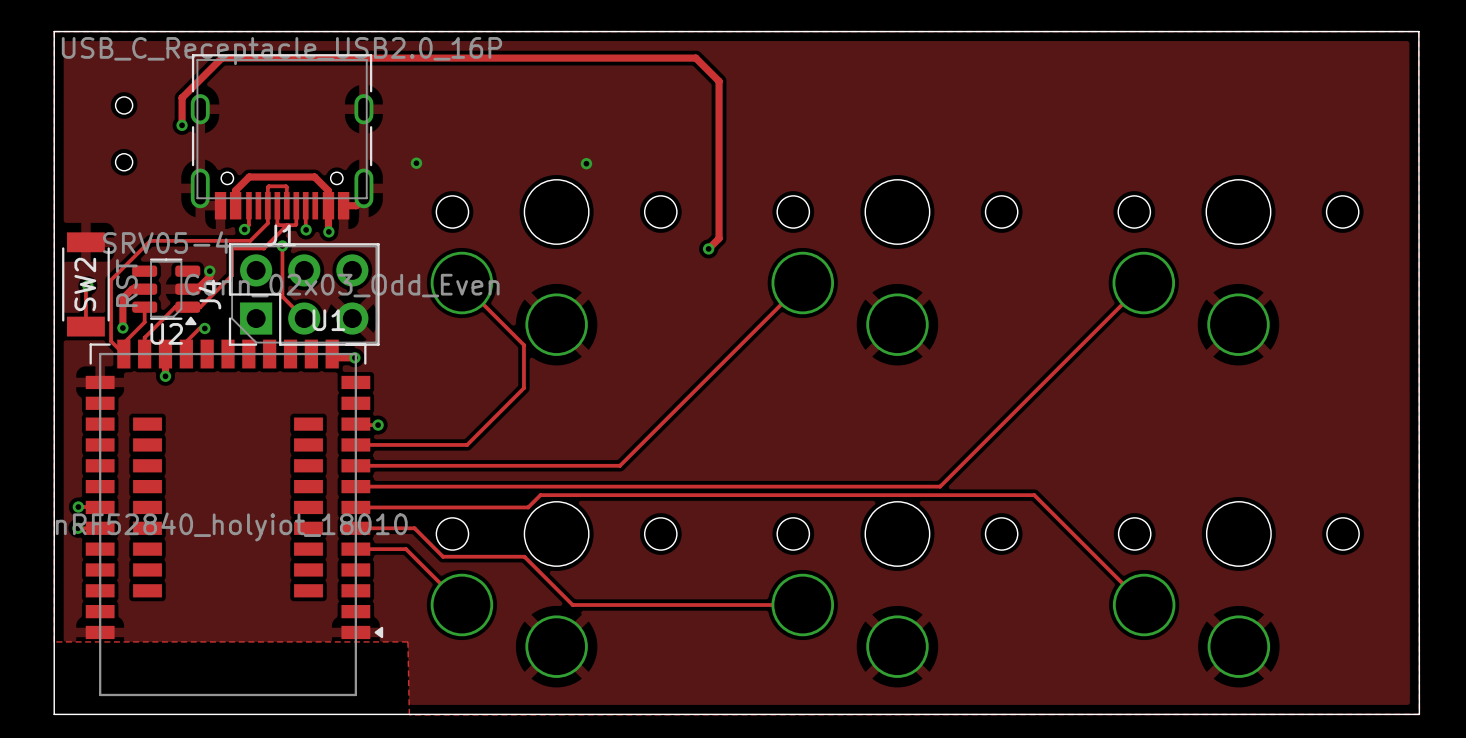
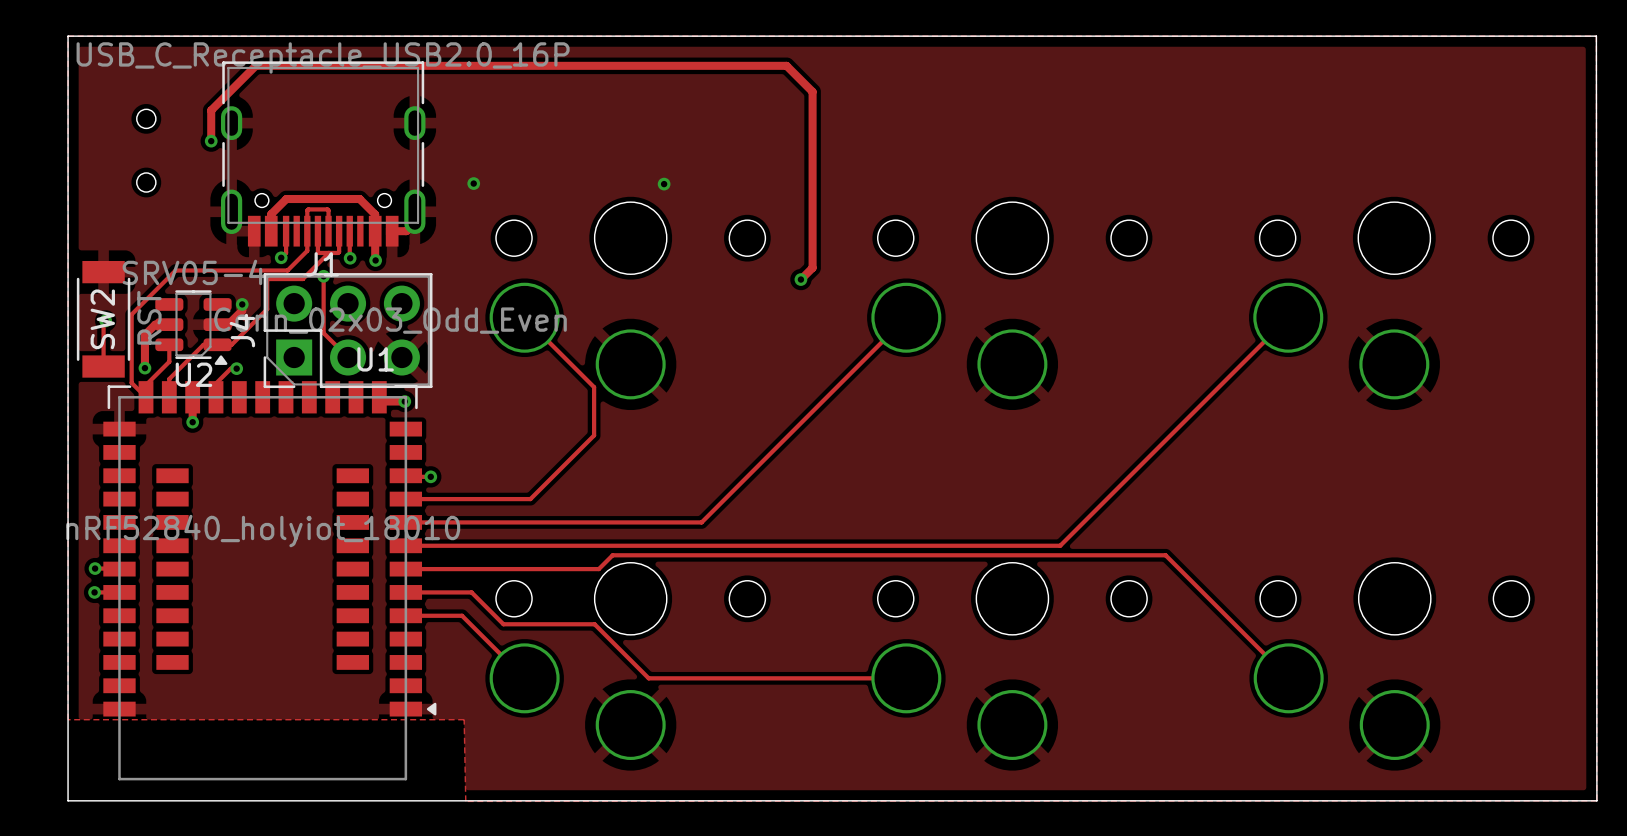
U1 value position: nRF52840_holyiot_18010 (231, 526) -> nRF52840_holyiot_18010 (263, 531)

